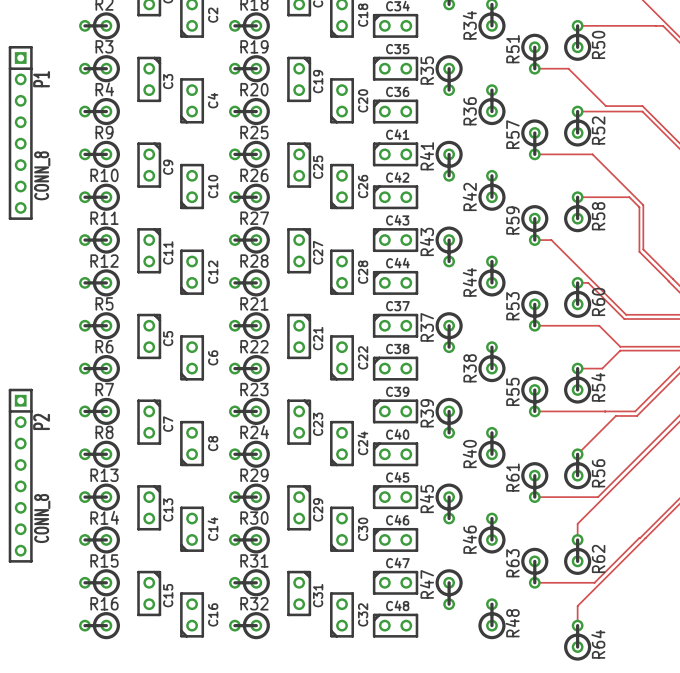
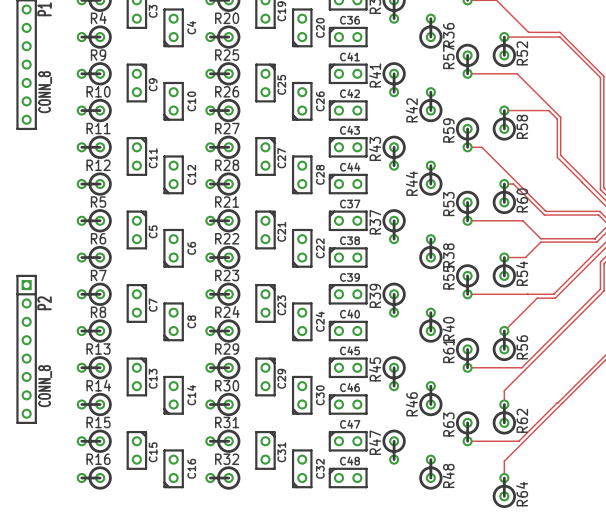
R36 name position: R36 (470, 111) -> R36 (448, 35)
R38 name position: R38 (470, 368) -> R38 (448, 255)
R40 name position: R40 (469, 454) -> R40 (448, 328)

